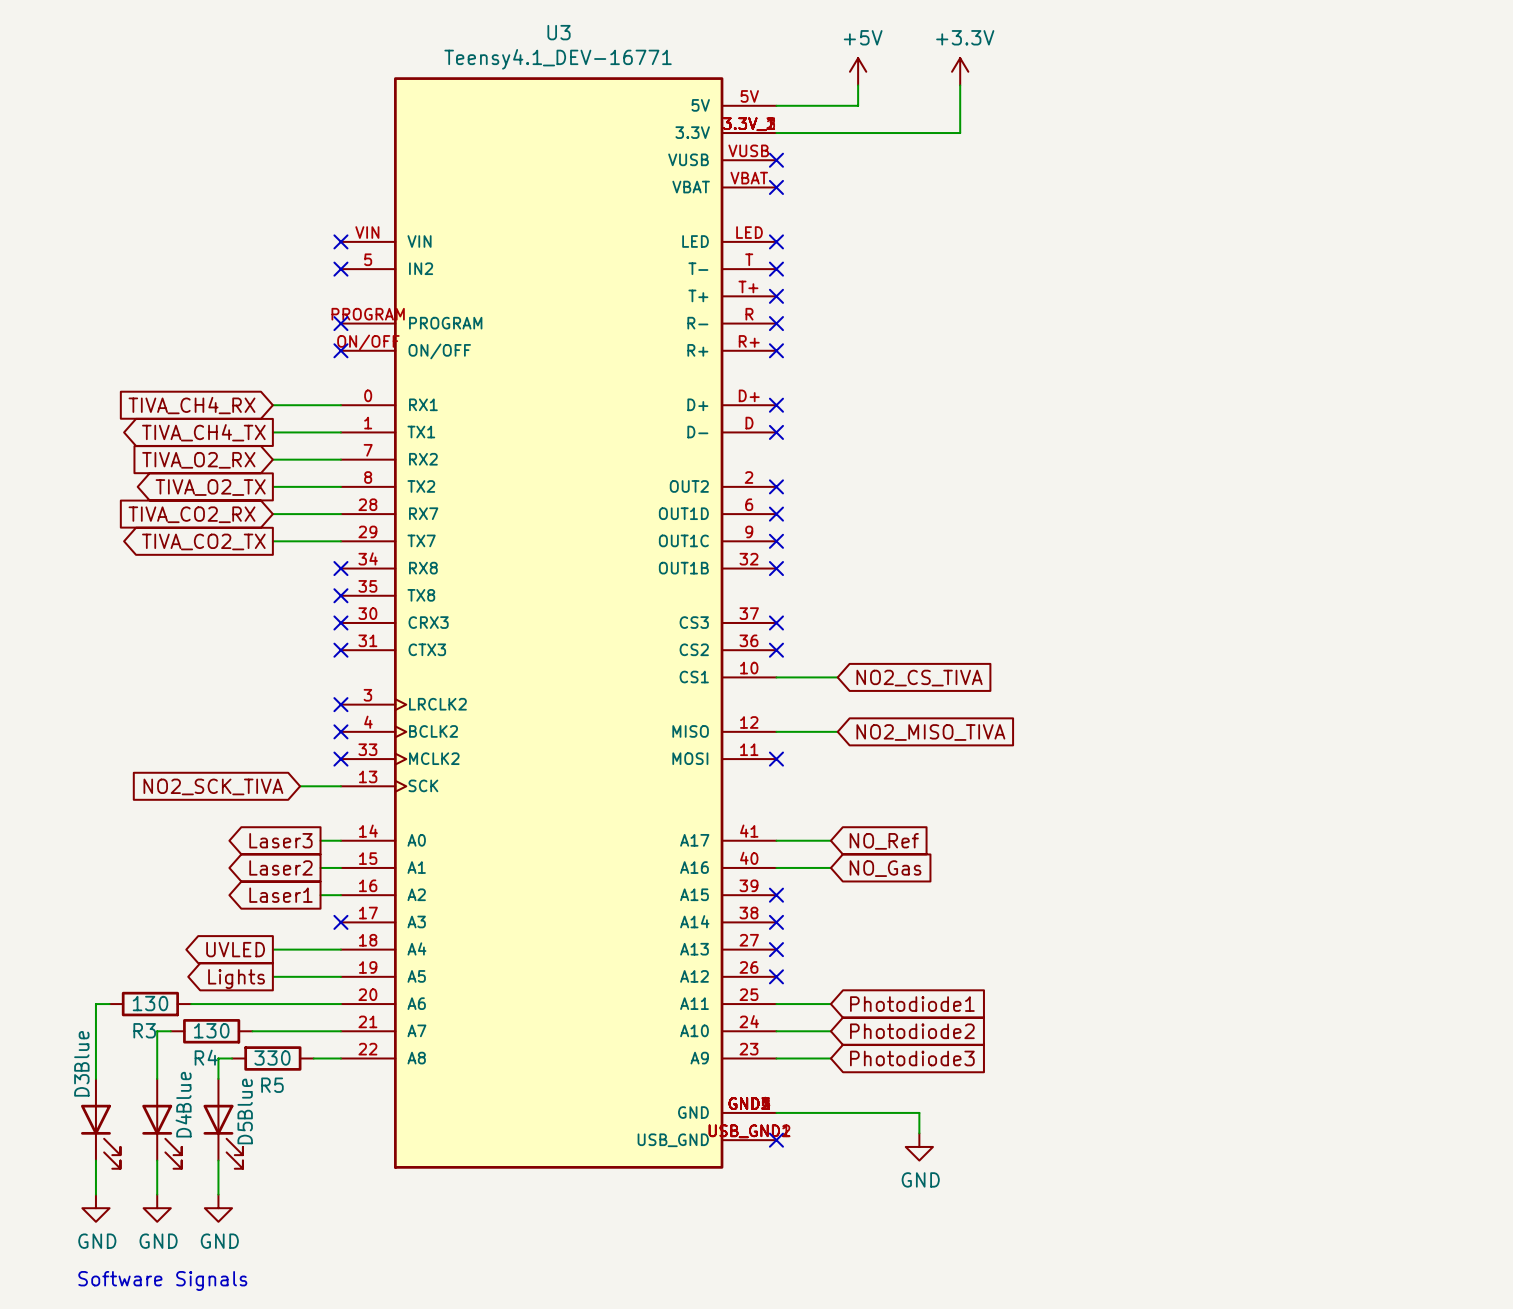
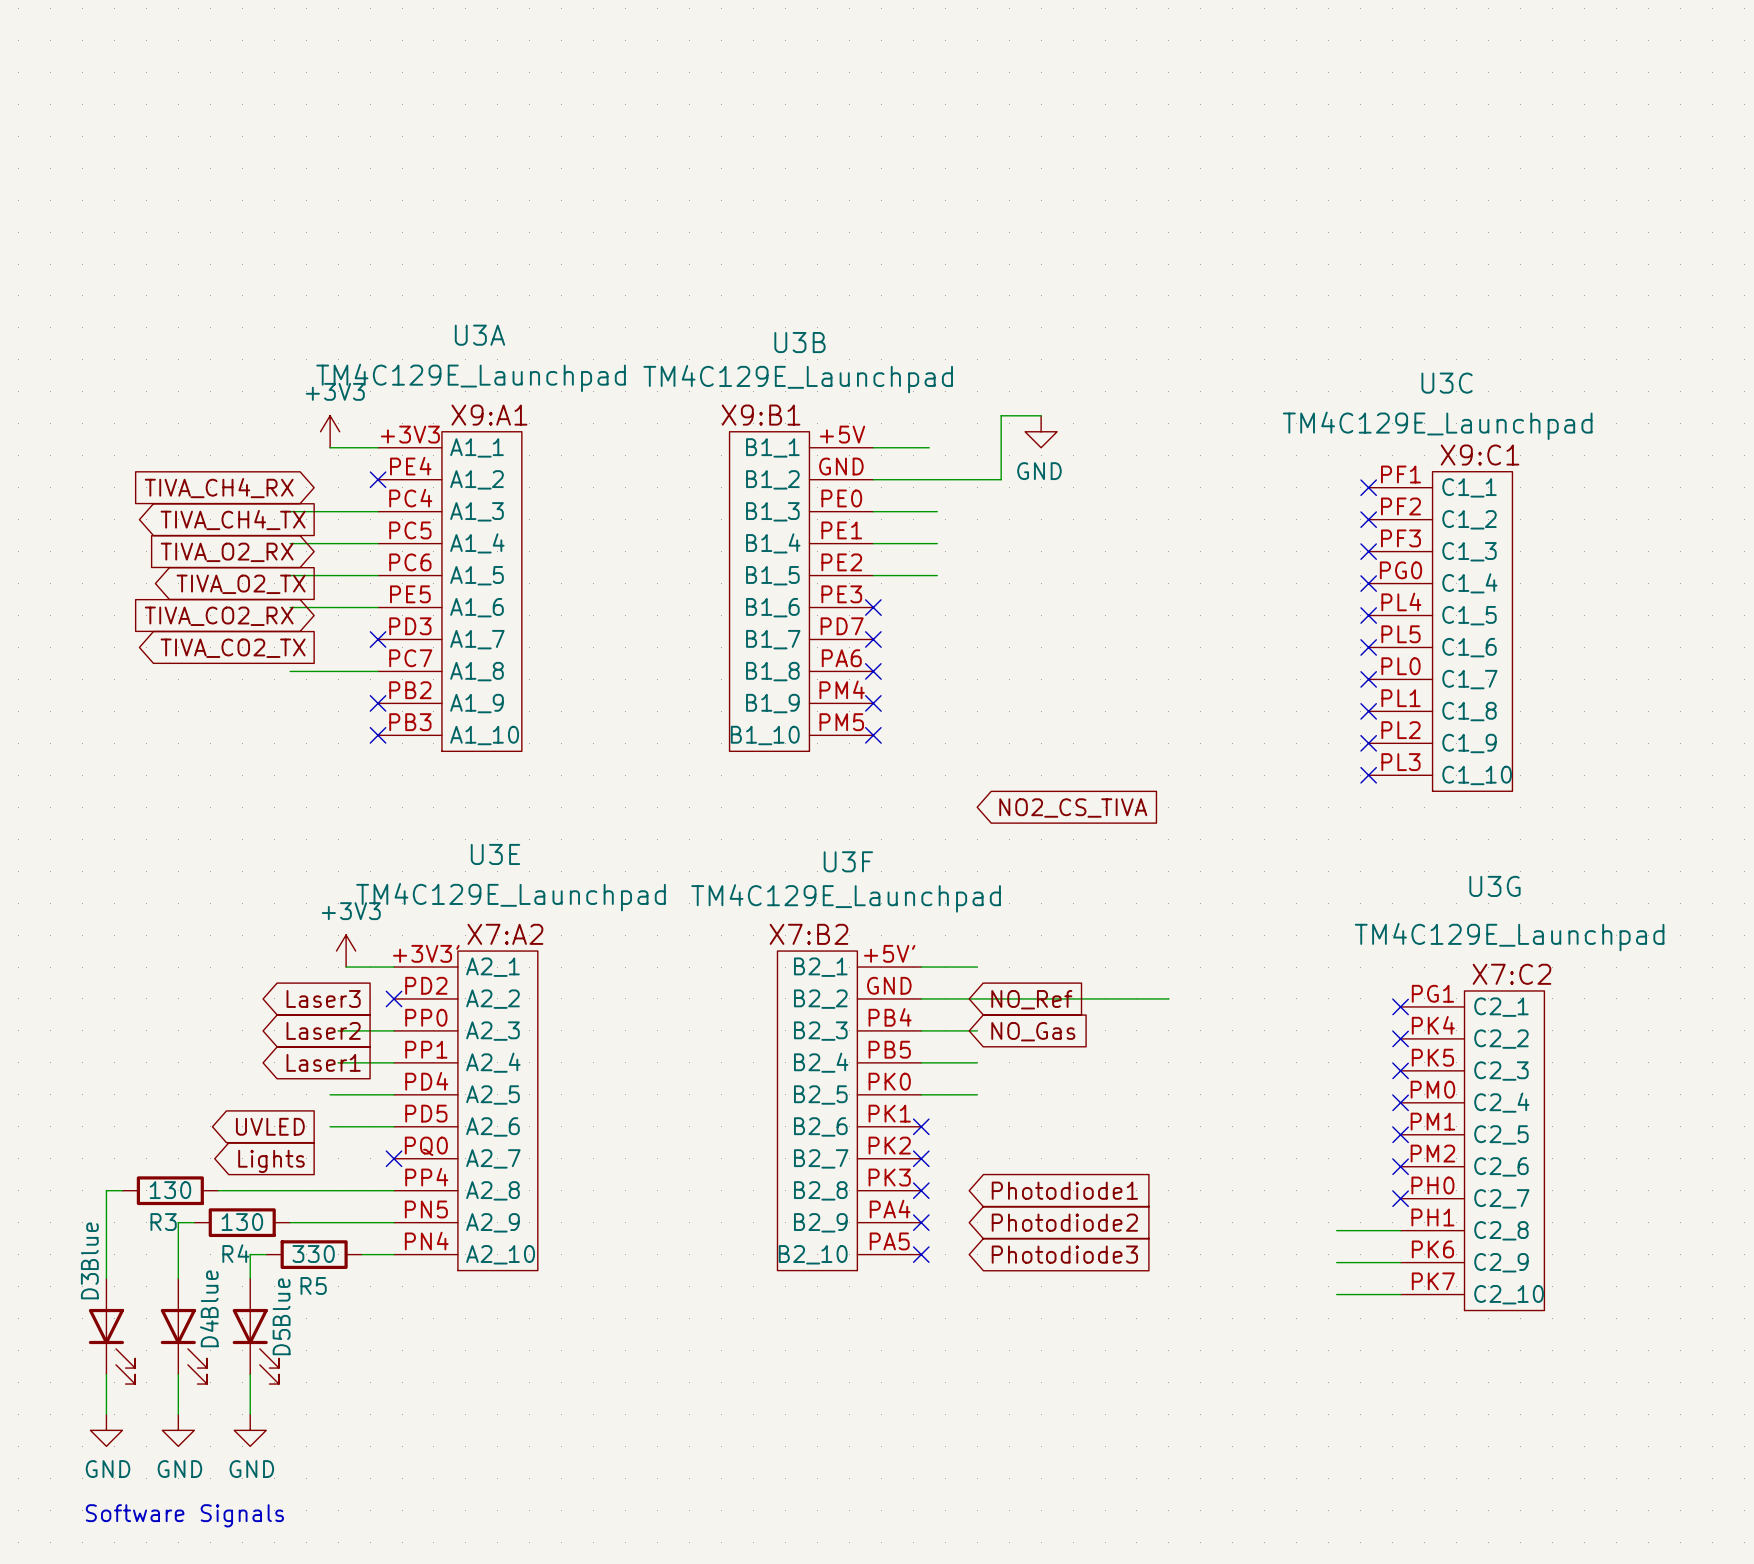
power symbol: +5V (858, 71) -> none
power symbol: +3.3V (960, 71) -> none
wire: (858, 85) (858, 105) (776, 105) -> none
wire: (960, 85) (960, 133) (776, 133) -> none
no-connect mark: (776, 160) -> none
no-connect mark: (776, 187) -> none
no-connect mark: (340, 241) -> none
no-connect mark: (776, 241) -> none
no-connect mark: (340, 269) -> none
no-connect mark: (776, 269) -> none
no-connect mark: (776, 296) -> none
no-connect mark: (340, 323) -> none
no-connect mark: (776, 323) -> none
wire: none -> (1041, 415) (1001, 415) (1001, 479) (873, 479)
no-connect mark: (340, 350) -> none
no-connect mark: (776, 350) -> none
power symbol: none -> +3V3 (330, 431)
power symbol: none -> GND (1041, 431)
wire: none -> (330, 447) (378, 447)
wire: none -> (873, 447) (929, 447)
no-connect mark: none -> (378, 479)
wire: (272, 405) (340, 405) -> none
no-connect mark: (776, 405) -> none
no-connect mark: none -> (1368, 487)
wire: none -> (290, 511) (378, 511)
wire: none -> (873, 511) (937, 511)
wire: (272, 432) (340, 432) -> none
no-connect mark: (776, 432) -> none
no-connect mark: none -> (1368, 519)
wire: none -> (290, 543) (378, 543)
wire: none -> (873, 543) (937, 543)
wire: (272, 459) (340, 459) -> none
no-connect mark: none -> (1368, 551)
wire: none -> (290, 575) (378, 575)
wire: none -> (873, 575) (937, 575)
wire: (272, 486) (340, 486) -> none
no-connect mark: (776, 486) -> none
no-connect mark: none -> (1368, 583)
U3A: none -> TM4C129E_Launchpad (449, 591)
U3B: none -> TM4C129E_Launchpad (801, 591)
wire: none -> (290, 607) (378, 607)
no-connect mark: none -> (873, 607)
wire: (272, 514) (340, 514) -> none
no-connect mark: (776, 514) -> none
no-connect mark: none -> (1368, 615)
U3C: none -> TM4C129E_Launchpad (1440, 631)
no-connect mark: none -> (378, 639)
no-connect mark: none -> (873, 639)
wire: (272, 541) (340, 541) -> none
no-connect mark: (776, 541) -> none
no-connect mark: none -> (1368, 647)
wire: none -> (290, 671) (378, 671)
no-connect mark: none -> (873, 671)
no-connect mark: (340, 568) -> none
no-connect mark: (776, 568) -> none
no-connect mark: none -> (1368, 679)
no-connect mark: none -> (378, 703)
no-connect mark: none -> (873, 703)
no-connect mark: (340, 595) -> none
no-connect mark: none -> (1368, 711)
no-connect mark: none -> (378, 735)
no-connect mark: none -> (873, 735)
no-connect mark: (340, 622) -> none
U3: Teensy4.1_DEV-16771 (558, 622) -> none
no-connect mark: (776, 622) -> none
no-connect mark: none -> (1368, 743)
no-connect mark: (340, 650) -> none
no-connect mark: (776, 650) -> none
no-connect mark: none -> (1368, 775)
wire: (776, 677) (837, 677) -> none
no-connect mark: (340, 704) -> none
no-connect mark: (340, 731) -> none
wire: (776, 731) (837, 731) -> none
global label: NO2_MISO_TIVA (930, 732) -> none
no-connect mark: (340, 759) -> none
no-connect mark: (776, 759) -> none
global label: NO2_SCK_TIVA (213, 786) -> none
wire: (300, 786) (340, 786) -> (346, 967) (394, 967)
power symbol: none -> +3V3 (346, 951)
wire: none -> (921, 967) (977, 967)
wire: (320, 840) (340, 840) -> none
no-connect mark: none -> (394, 998)
wire: none -> (969, 998) (1168, 998)
no-connect mark: none -> (1400, 1006)
wire: none -> (338, 1030) (370, 1030)
wire: none -> (969, 1030) (977, 1030)
no-connect mark: none -> (1400, 1038)
wire: none -> (338, 1062) (370, 1062)
no-connect mark: (776, 895) -> none
wire: none -> (921, 1062) (977, 1062)
no-connect mark: none -> (1400, 1070)
wire: none -> (330, 1094) (394, 1094)
no-connect mark: (340, 922) -> none
no-connect mark: (776, 922) -> none
wire: none -> (921, 1094) (977, 1094)
no-connect mark: none -> (1400, 1102)
U3E: none -> TM4C129E_Launchpad (465, 1110)
U3F: none -> TM4C129E_Launchpad (849, 1110)
wire: (272, 949) (286, 949) -> none
no-connect mark position: (776, 949) -> (921, 1126)
no-connect mark: none -> (1400, 1134)
U3G: none -> TM4C129E_Launchpad (1472, 1150)
wire: (272, 976) (340, 976) -> none
no-connect mark: none -> (394, 1158)
no-connect mark position: (776, 976) -> (921, 1158)
no-connect mark: none -> (1400, 1166)
wire: (776, 1004) (830, 1004) -> none
no-connect mark: none -> (921, 1190)
no-connect mark: none -> (1400, 1198)
wire: (776, 1031) (830, 1031) -> none
no-connect mark: none -> (921, 1222)
wire: none -> (1336, 1230) (1400, 1230)
wire: (776, 1058) (830, 1058) -> none
no-connect mark: none -> (921, 1254)
wire: none -> (1336, 1262) (1400, 1262)
wire: none -> (1336, 1294) (1400, 1294)
wire: (776, 1112) (919, 1112) (919, 1133) -> none
no-connect mark: (776, 1140) -> none
power symbol: GND (919, 1146) -> none

